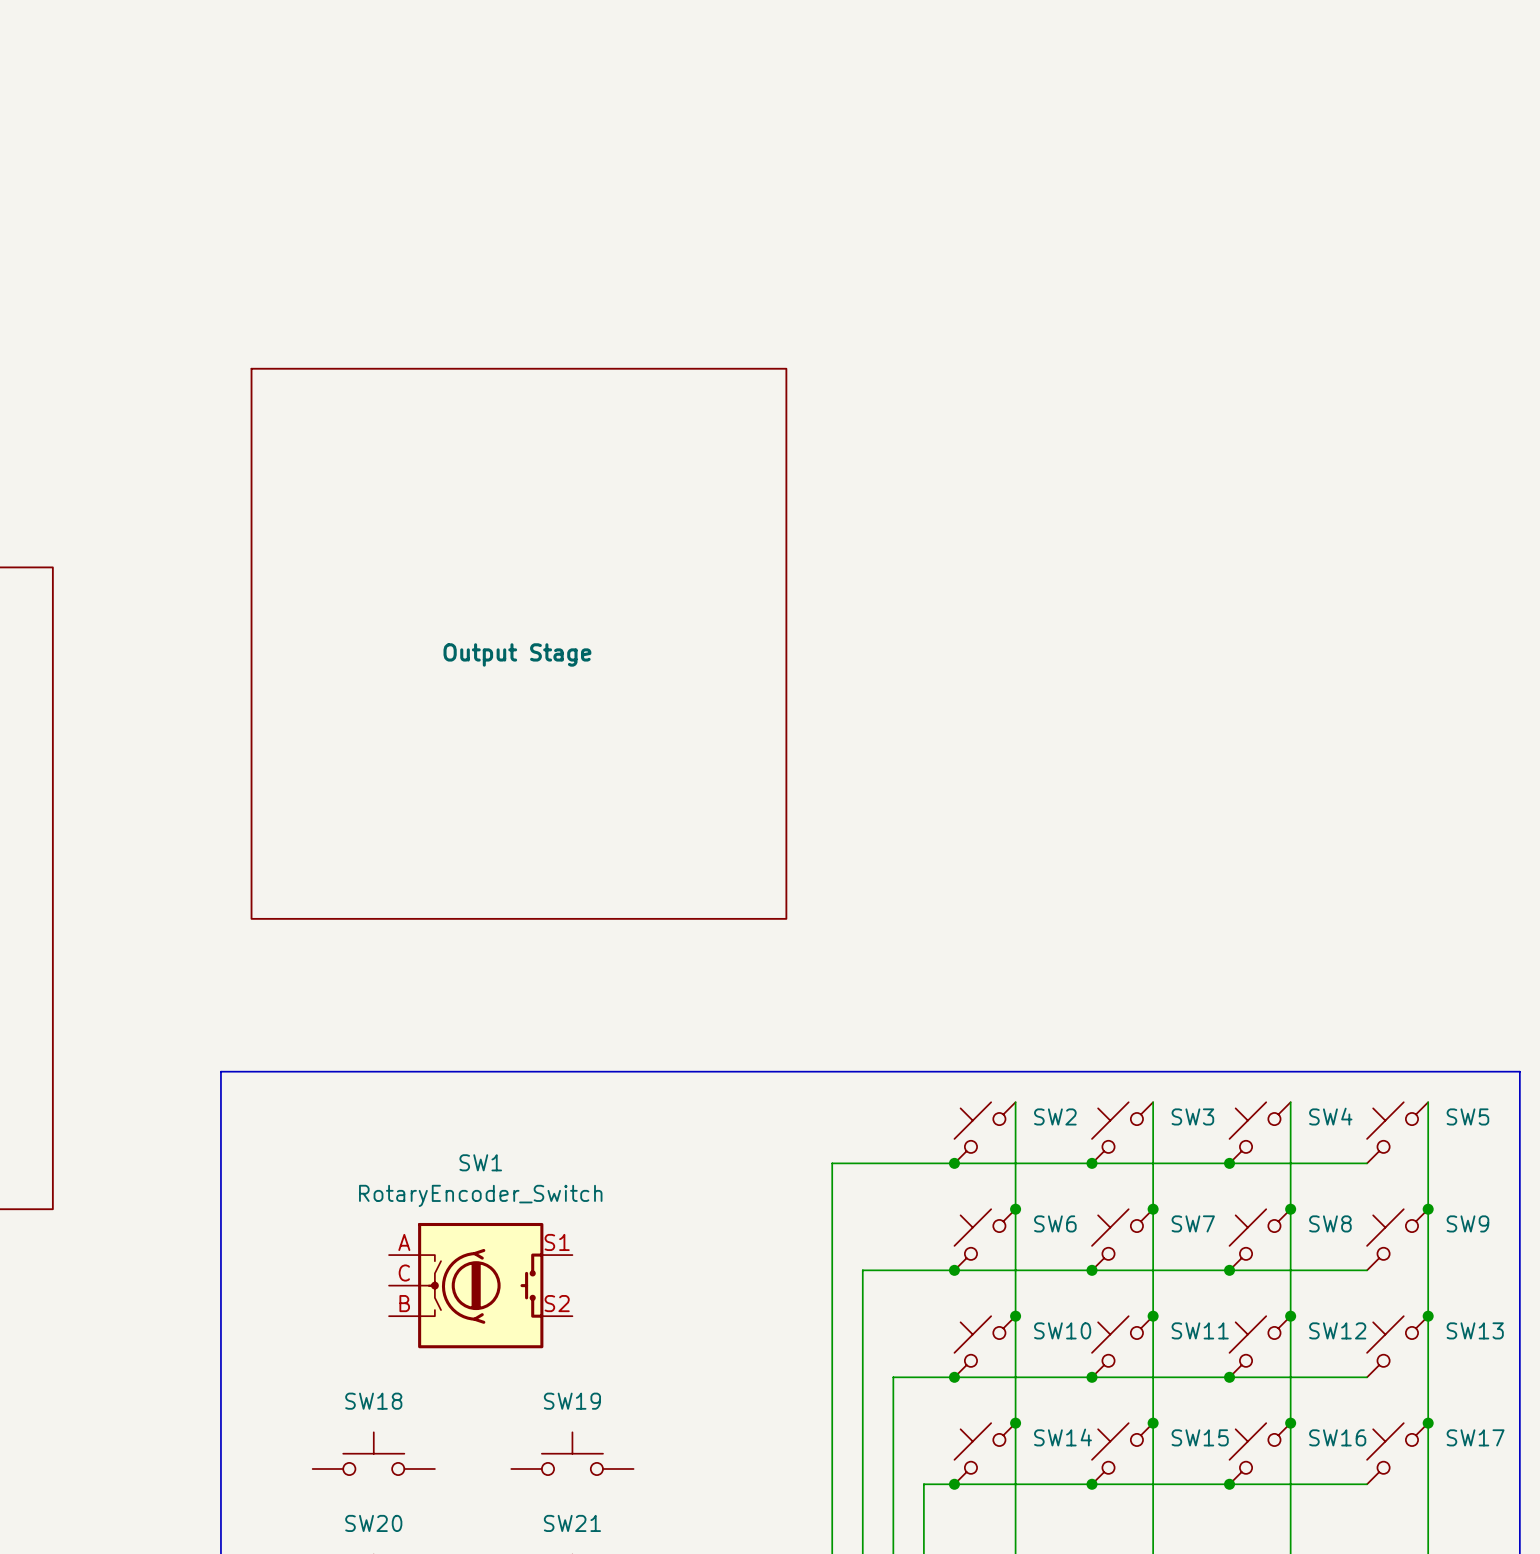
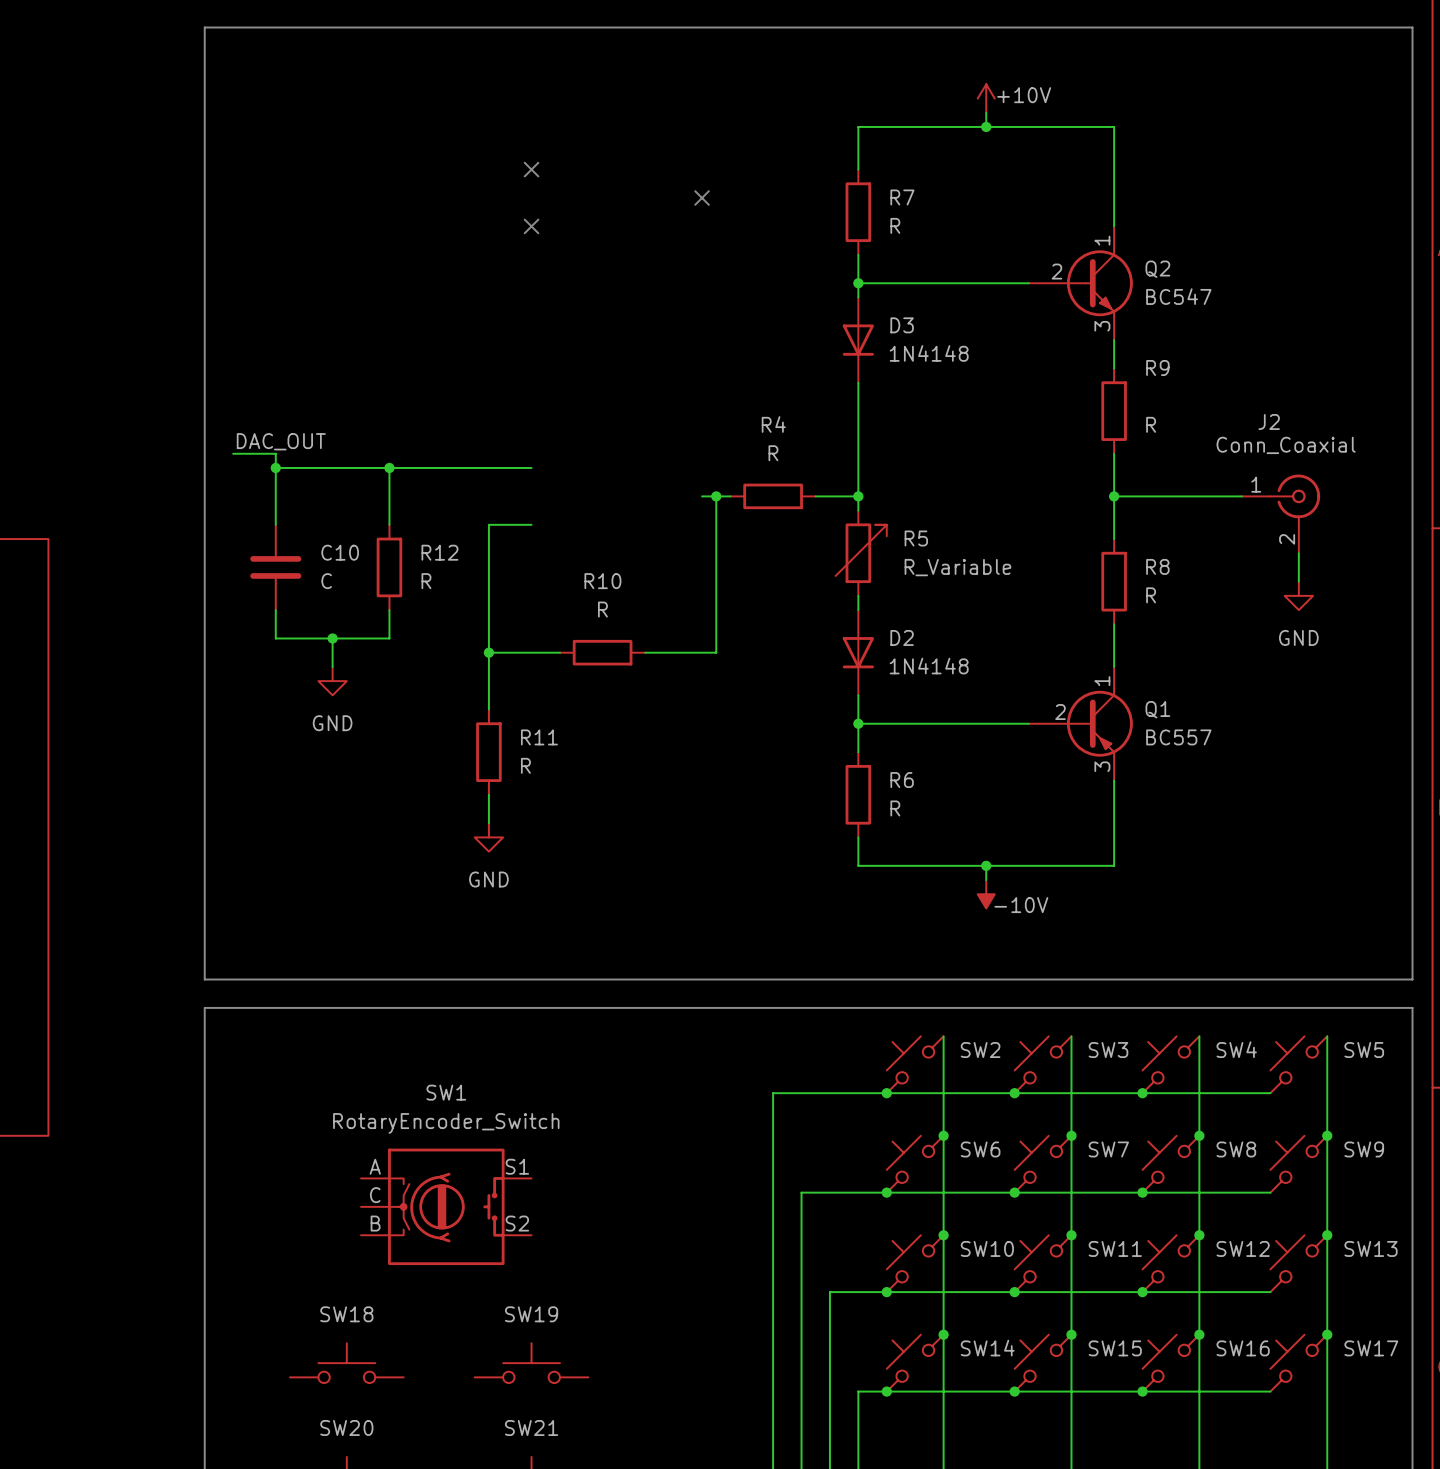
line: none -> (204, 27) (1412, 27) (1412, 979) (204, 979) (204, 27)
power symbol: none -> +10V (986, 98)
wire: none -> (986, 112) (986, 126)
junction: none -> (986, 126)
no-connect mark: none -> (531, 169)
wire: none -> (858, 169) (858, 126) (1114, 126) (1114, 226)
no-connect mark: none -> (702, 198)
R7: none -> R (858, 212)
no-connect mark: none -> (531, 226)
wire: none -> (858, 254) (858, 297)
wire: none -> (858, 283) (1028, 283)
junction: none -> (858, 283)
Q2: none -> BC547 (1080, 283)
D3: none -> 1N4148 (858, 340)
wire: none -> (1114, 340) (1114, 368)
wire: none -> (858, 382) (858, 510)
R9: none -> R (1114, 411)
label: none -> DAC_OUT (281, 441)
wire: none -> (233, 453) (275, 453) (275, 524)
wire: none -> (1114, 453) (1114, 539)
wire: none -> (275, 467) (531, 467)
junction: none -> (275, 467)
wire: none -> (389, 467) (389, 524)
junction: none -> (389, 467)
wire: none -> (702, 496) (730, 496)
wire: none -> (716, 496) (716, 652) (645, 652)
junction: none -> (716, 496)
R4: none -> R (773, 496)
wire: none -> (815, 496) (858, 496)
junction: none -> (858, 496)
wire: none -> (1114, 496) (1242, 496)
junction: none -> (1114, 496)
J2: none -> Conn_Coaxial (1281, 513)
wire: none -> (531, 524) (488, 524) (488, 709)
R5: none -> R_Variable (861, 553)
wire: none -> (1298, 553) (1298, 581)
C10: none -> C (275, 567)
R12: none -> R (389, 567)
R8: none -> R (1114, 581)
wire: none -> (858, 595) (858, 610)
power symbol: none -> GND (1298, 595)
wire: none -> (275, 610) (275, 638) (389, 638) (389, 610)
sheet Output Stage: (518, 643) -> none
wire: none -> (1114, 624) (1114, 666)
wire: none -> (332, 638) (332, 666)
junction: none -> (332, 638)
wire: none -> (488, 652) (559, 652)
junction: none -> (488, 652)
R10: none -> R (602, 652)
D2: none -> 1N4148 (858, 652)
power symbol: none -> GND (332, 681)
wire: none -> (858, 695) (858, 752)
wire: none -> (858, 723) (1028, 723)
junction: none -> (858, 723)
Q1: none -> BC557 (1080, 723)
R11: none -> R (488, 752)
wire: none -> (1114, 780) (1114, 865) (858, 865) (858, 837)
wire: none -> (488, 794) (488, 823)
R6: none -> R (858, 794)
power symbol: none -> GND (488, 837)
wire: none -> (986, 865) (986, 880)
junction: none -> (986, 865)
power symbol: none -> -10V (986, 894)

